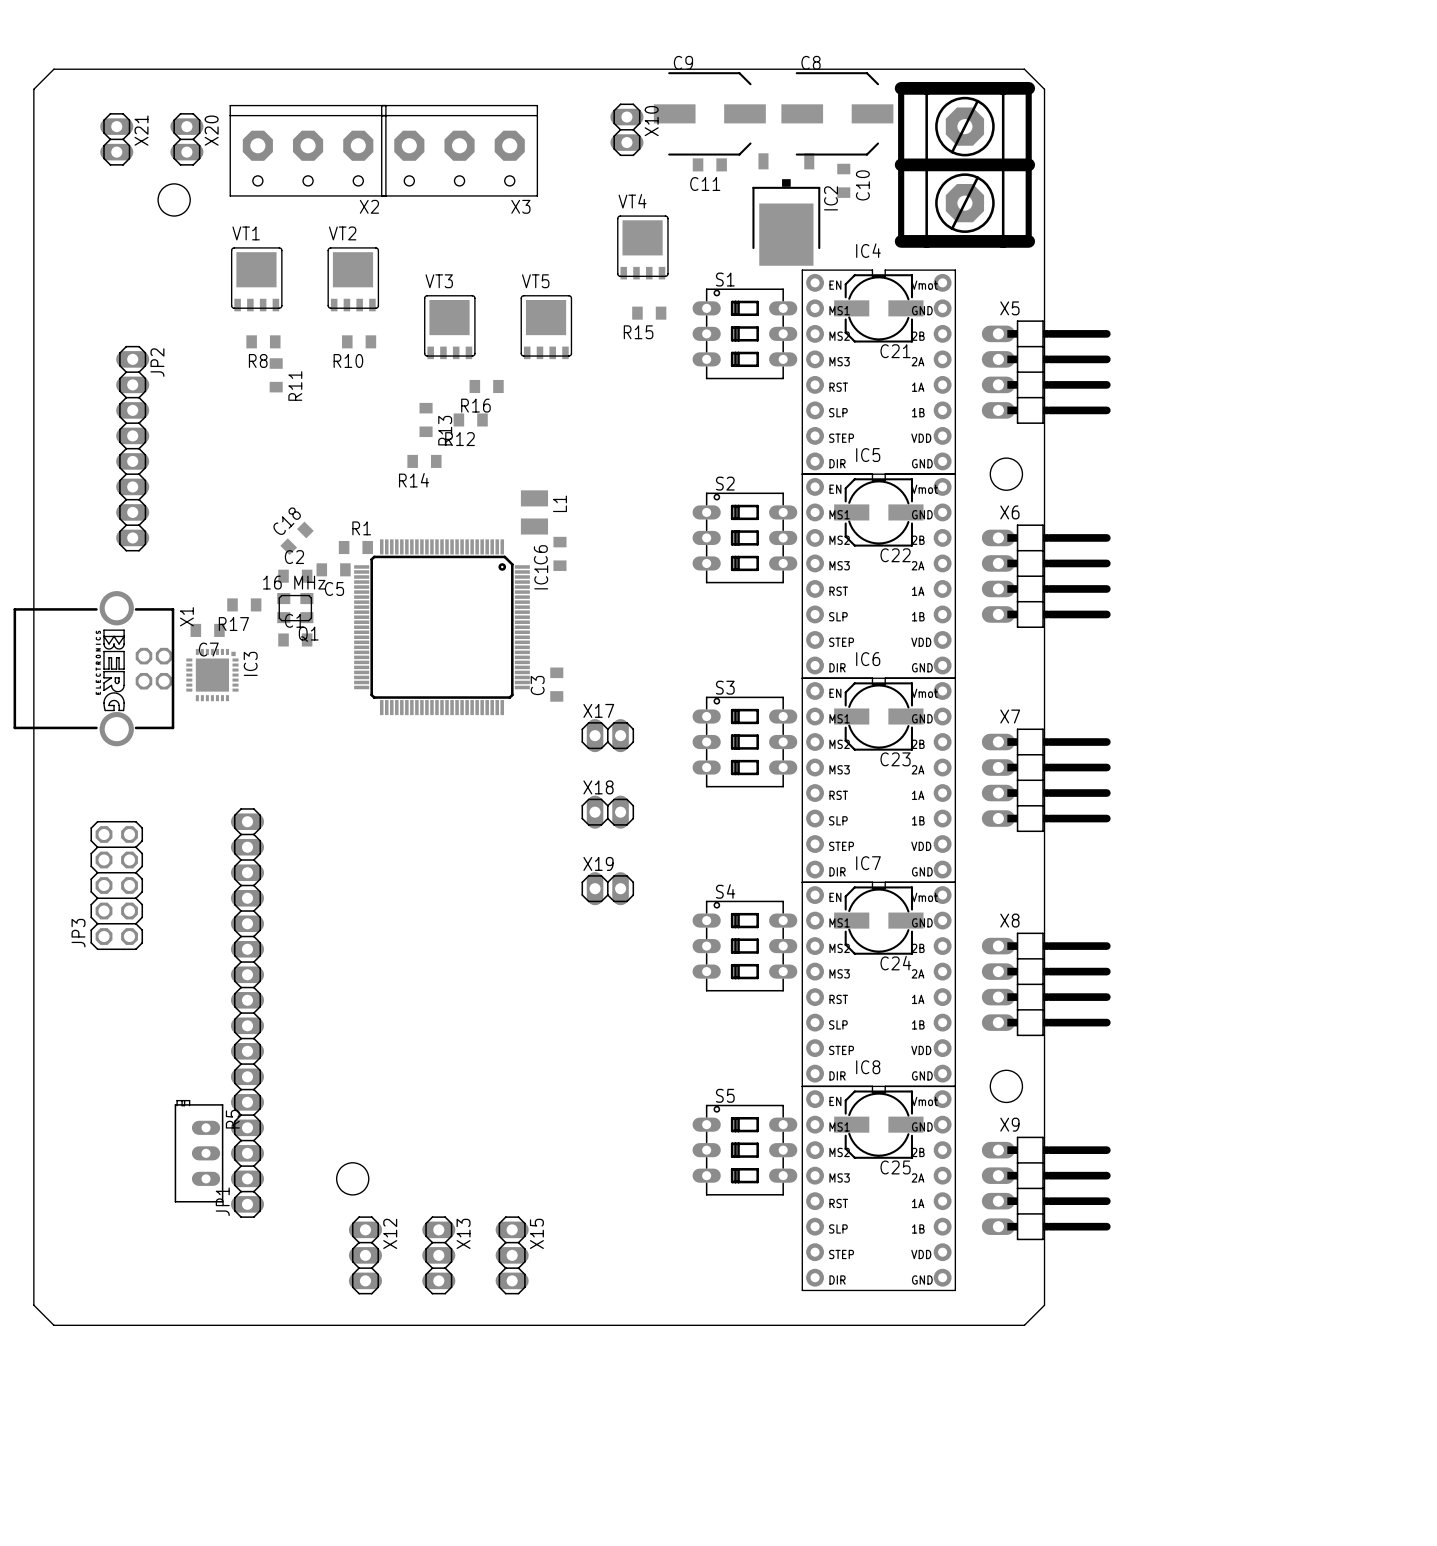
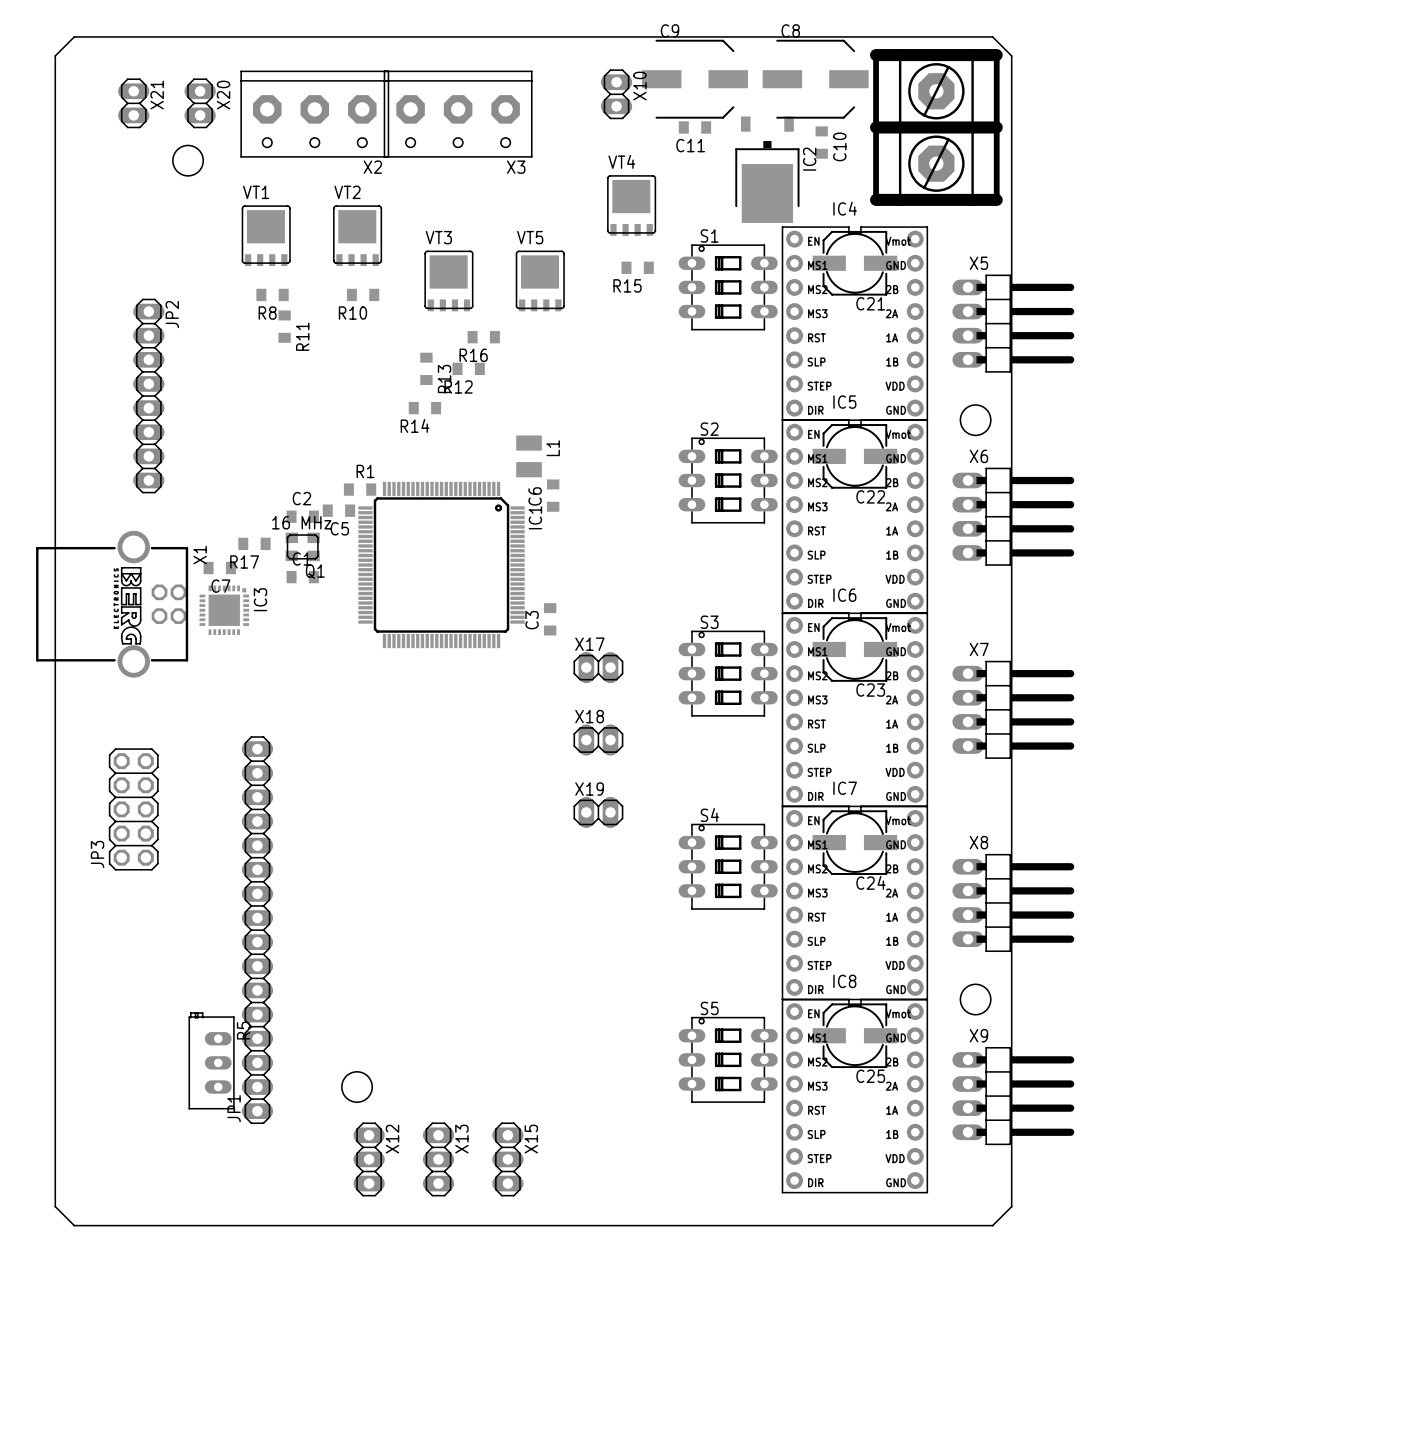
C18: (297, 538) -> none

